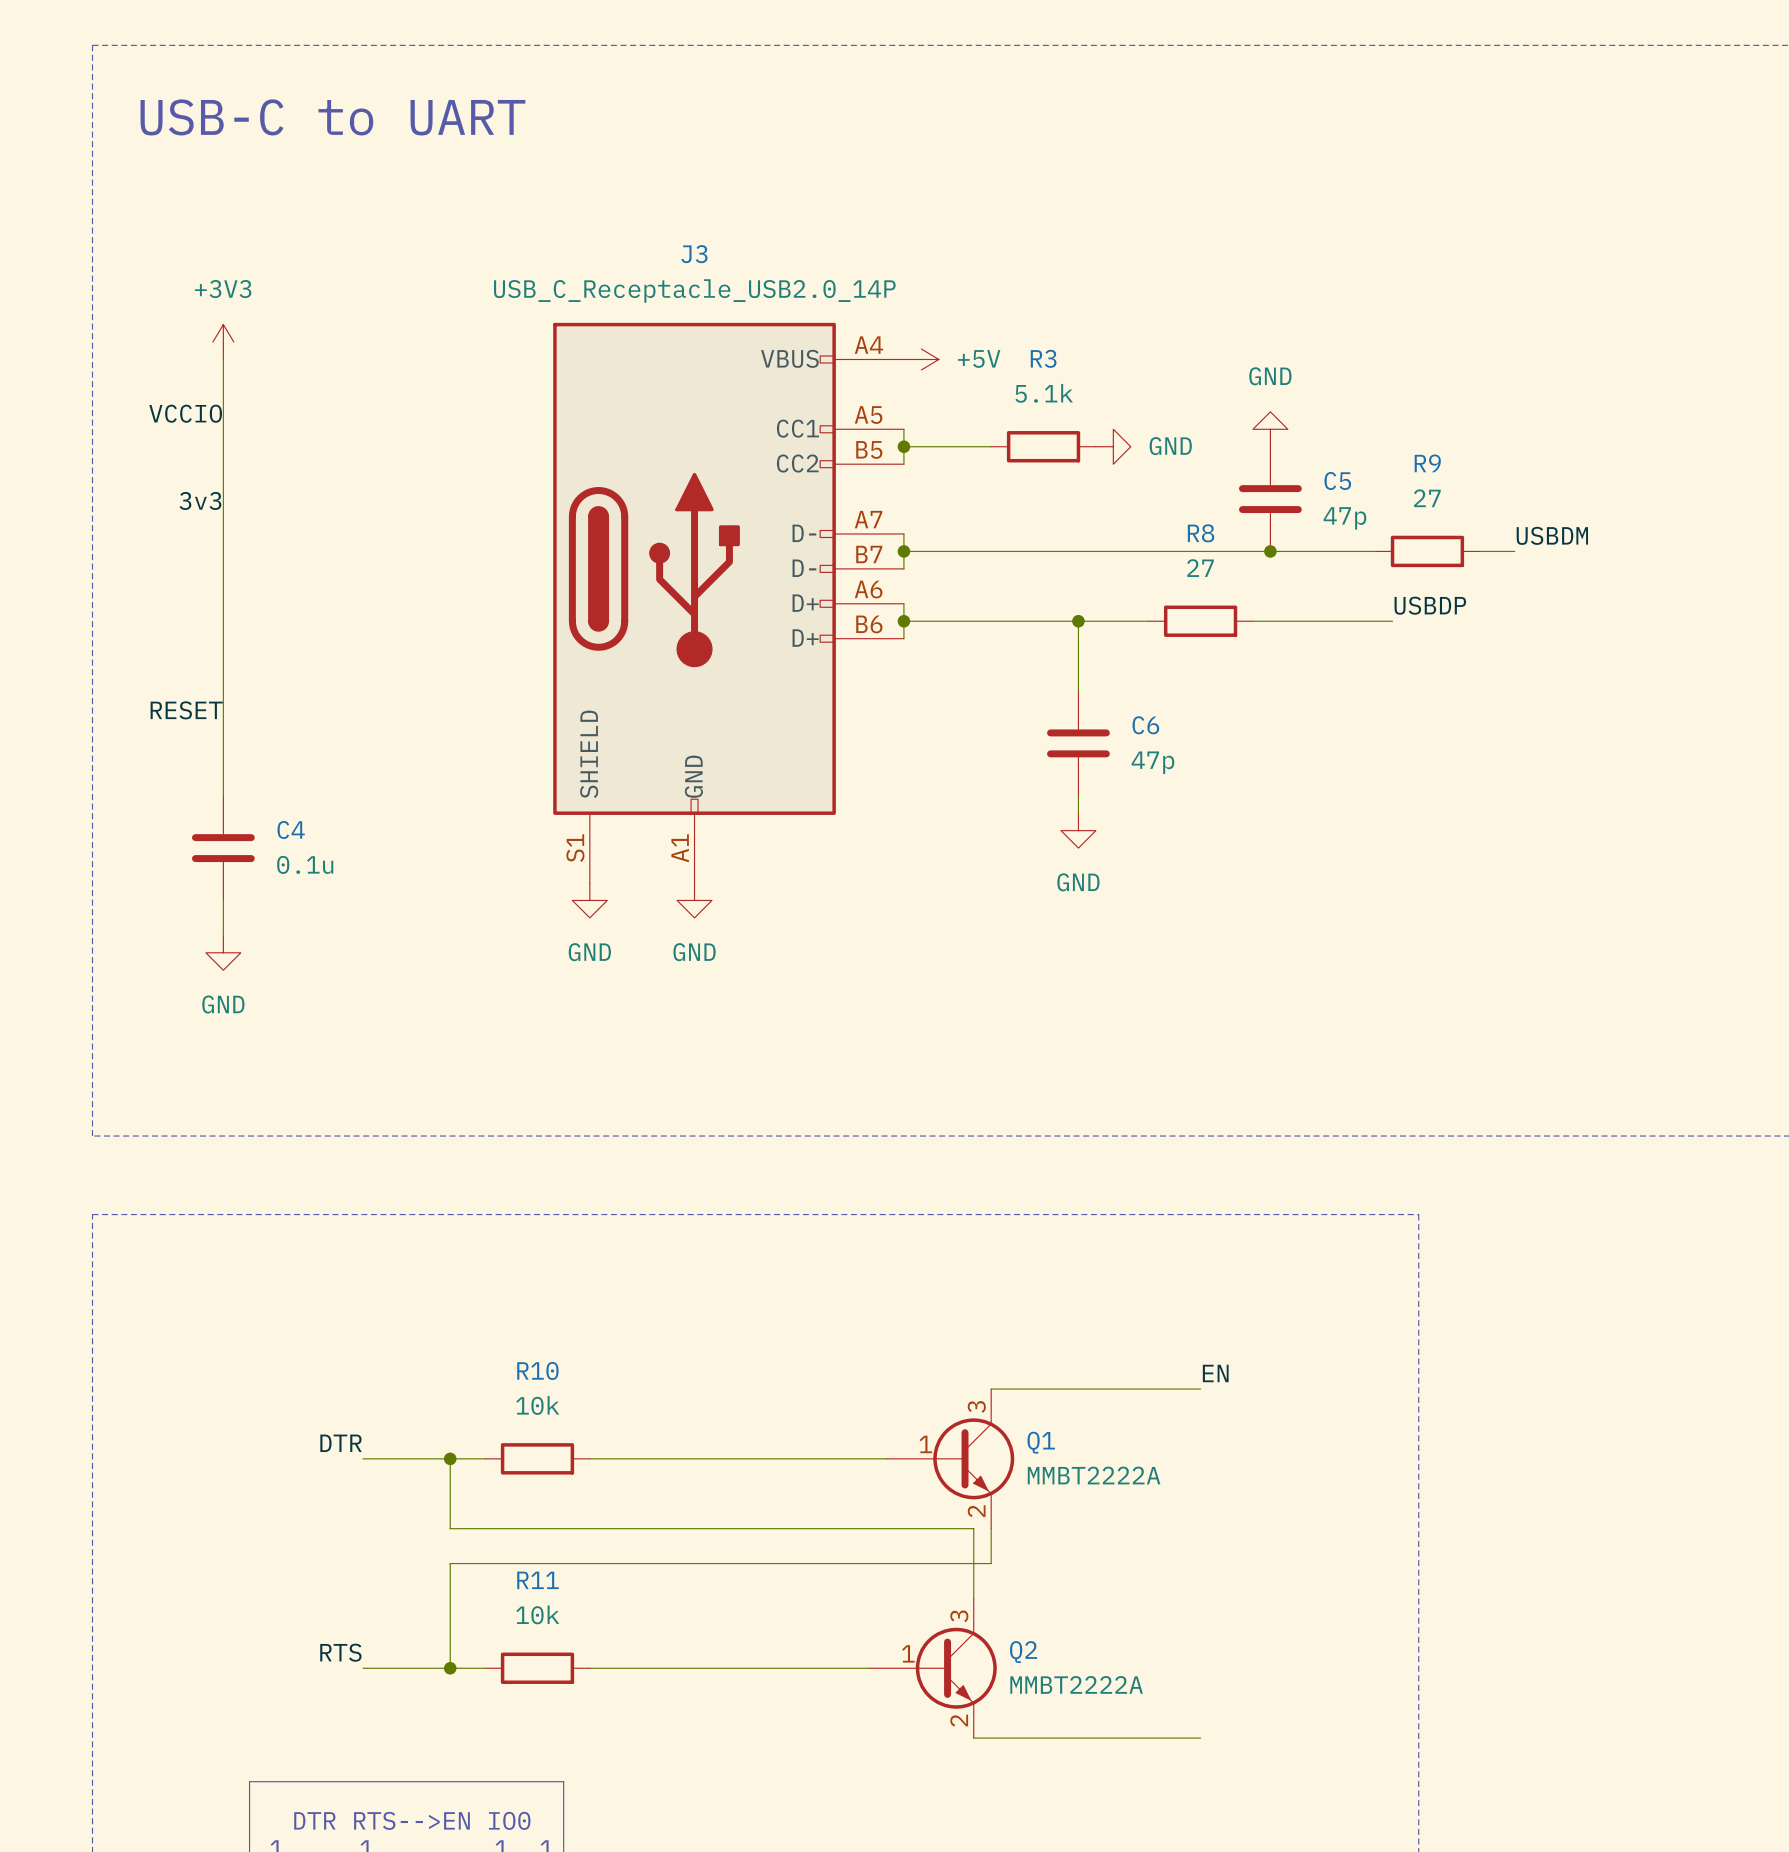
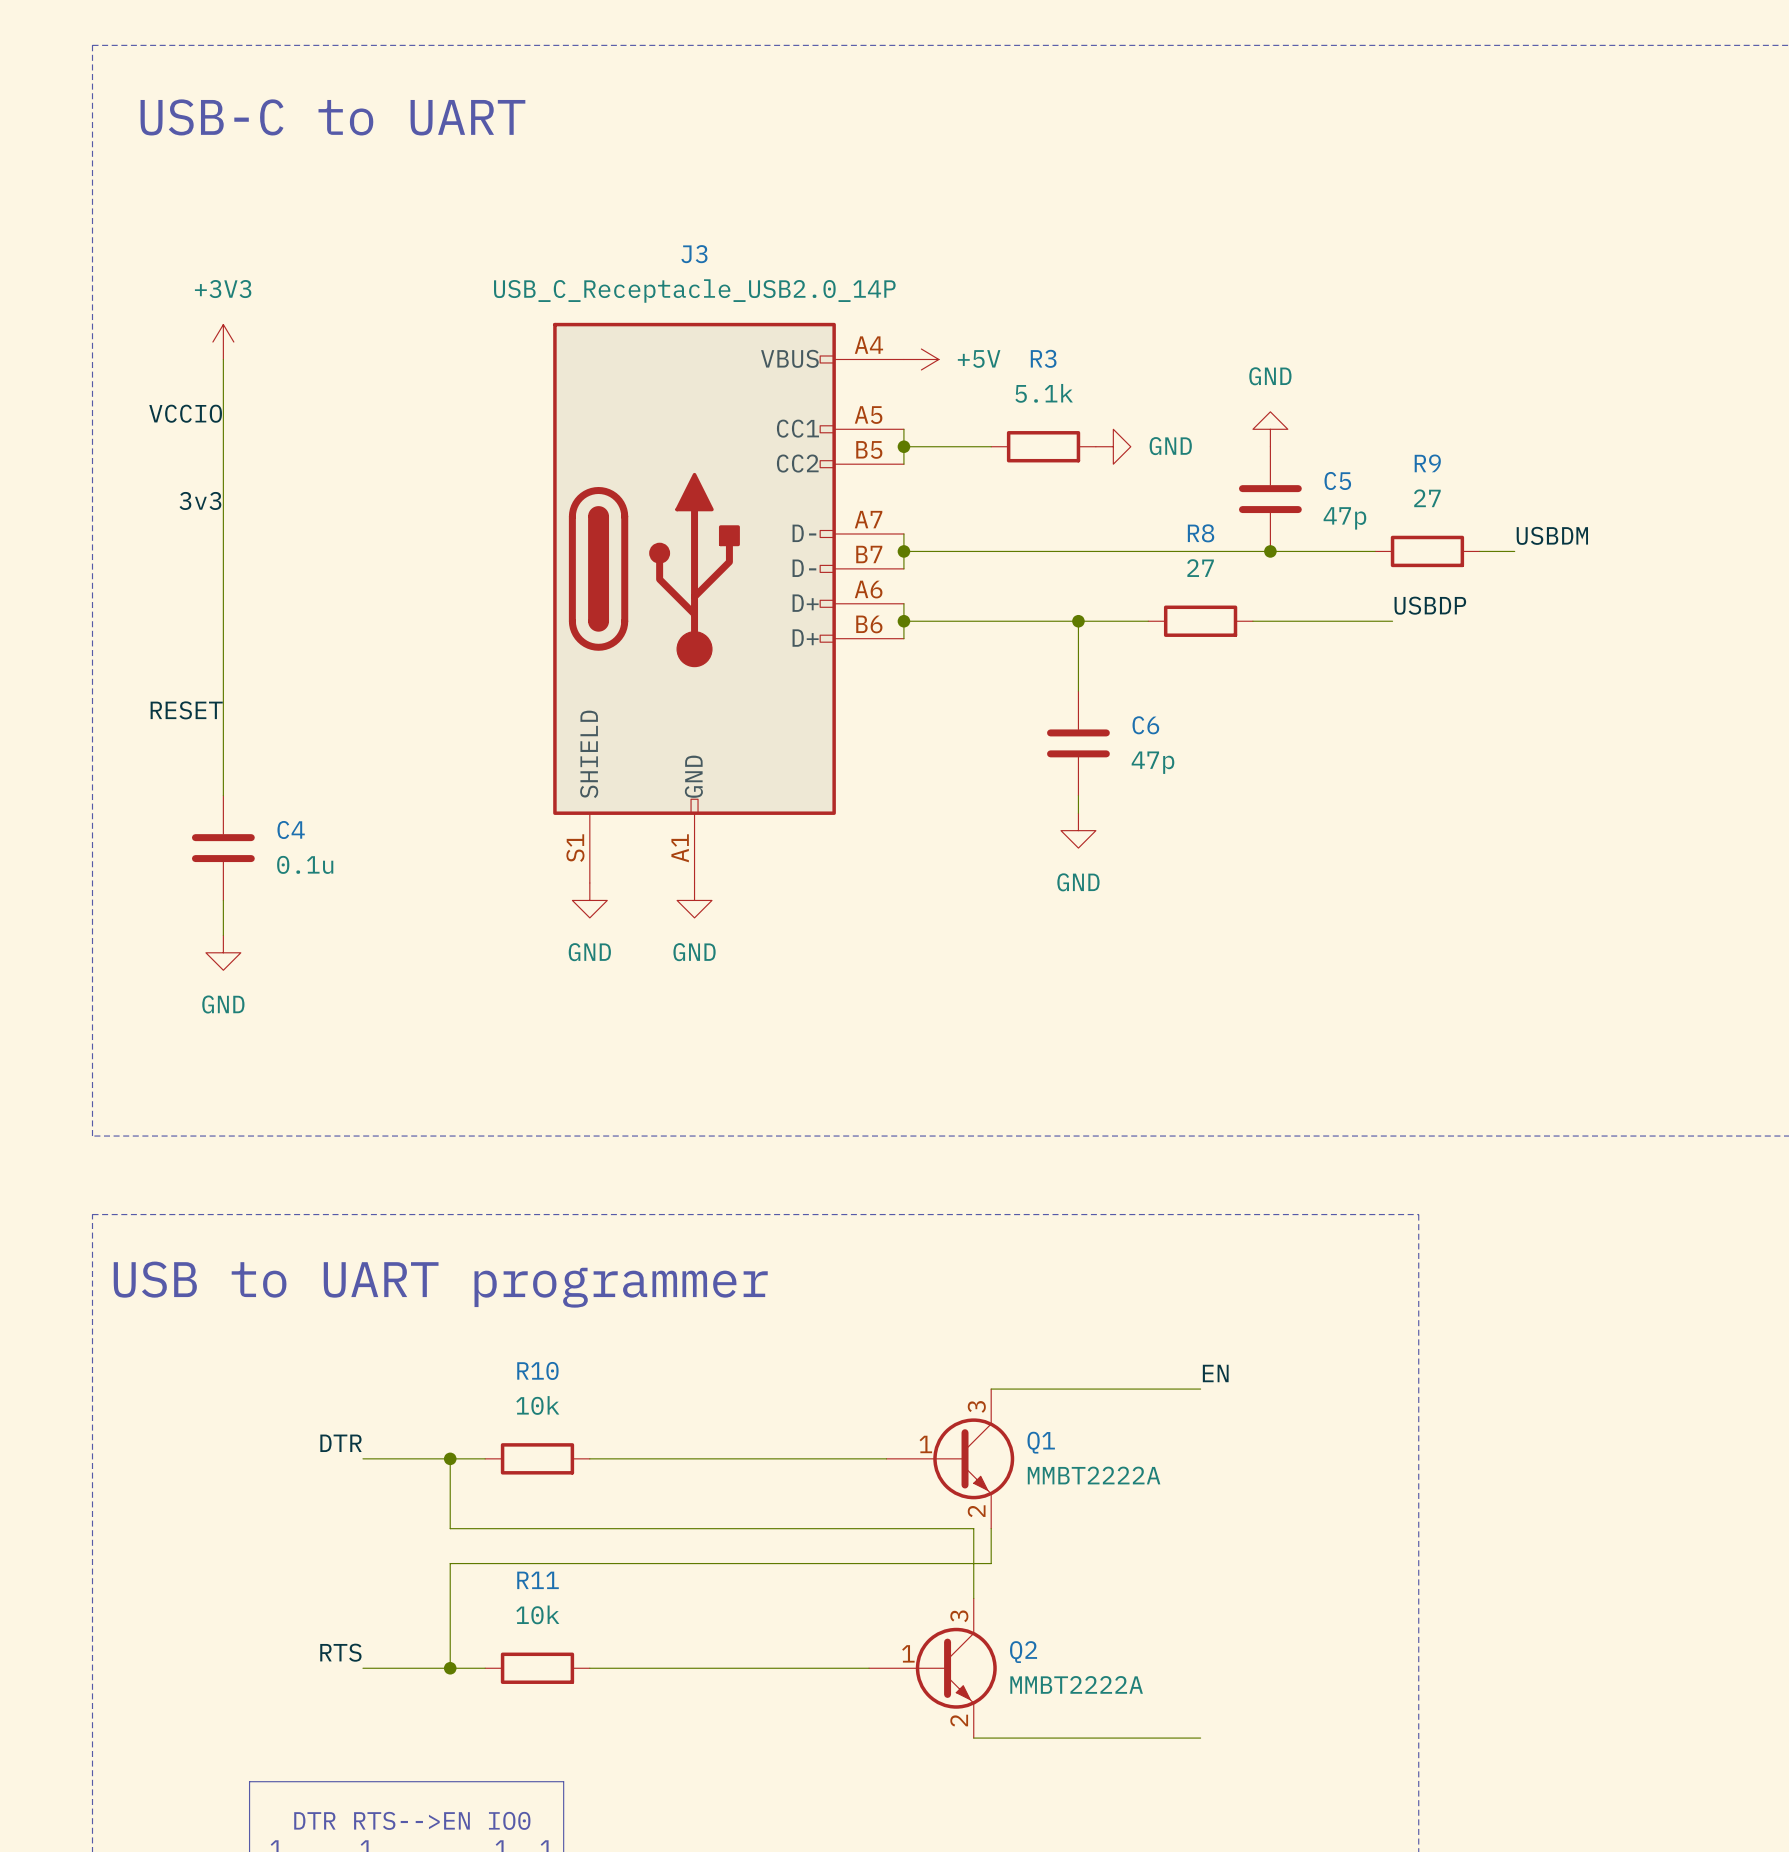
text: none -> USB to UART programmer (440, 1284)

